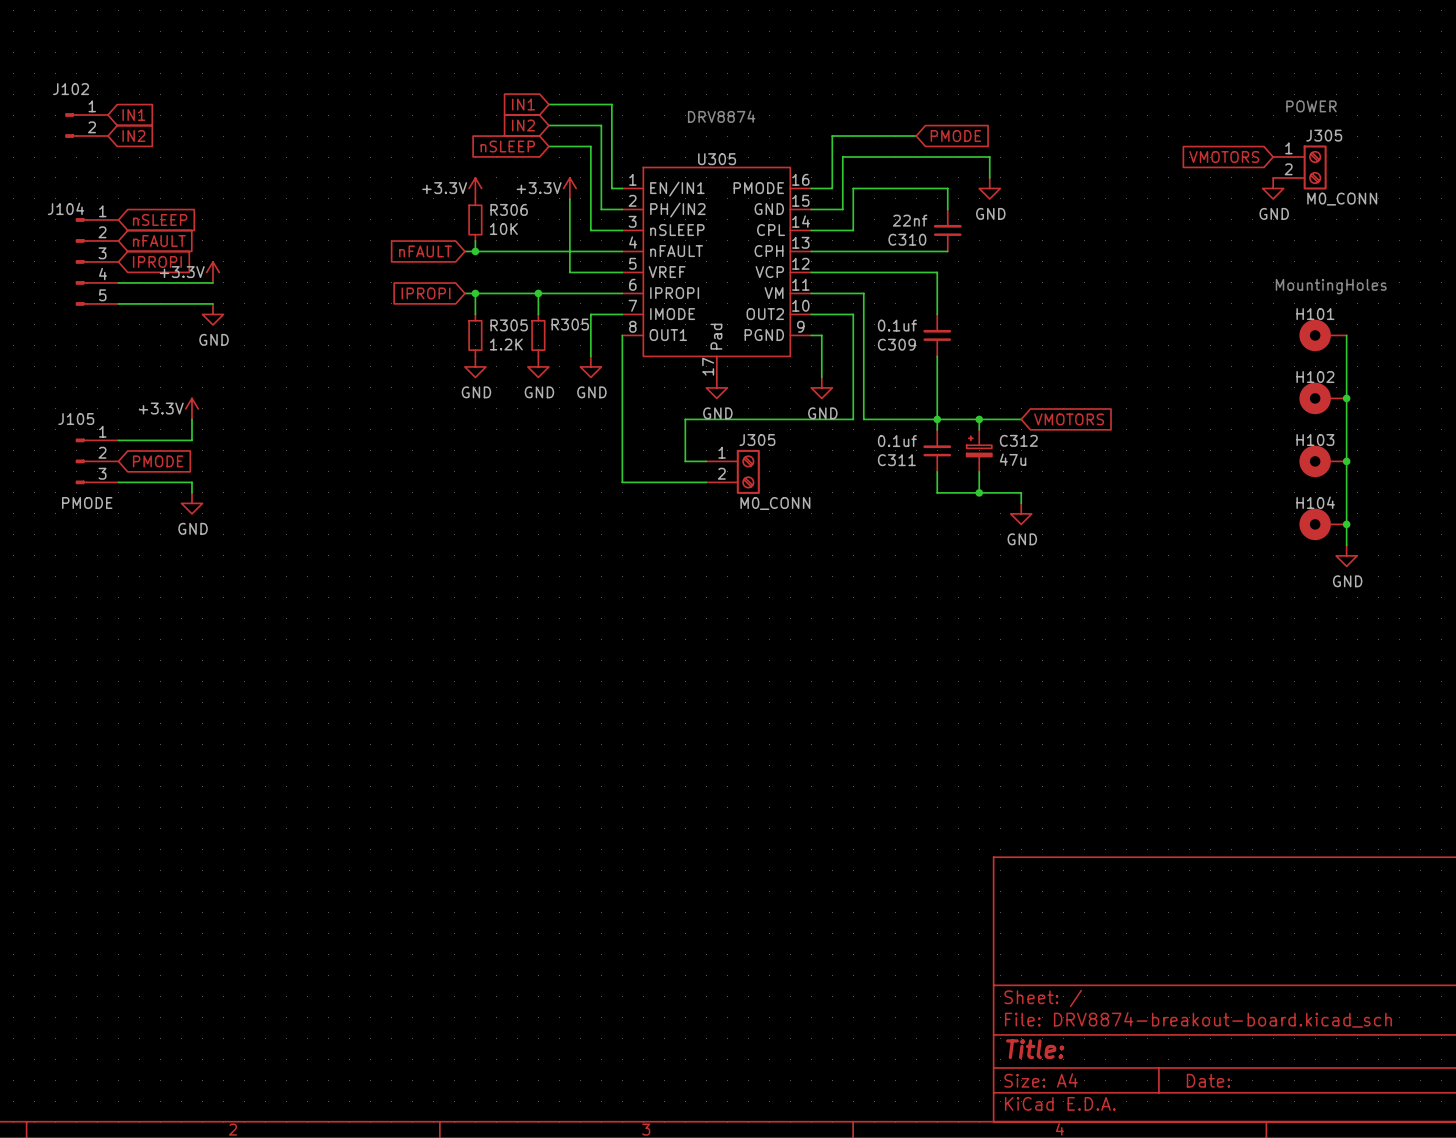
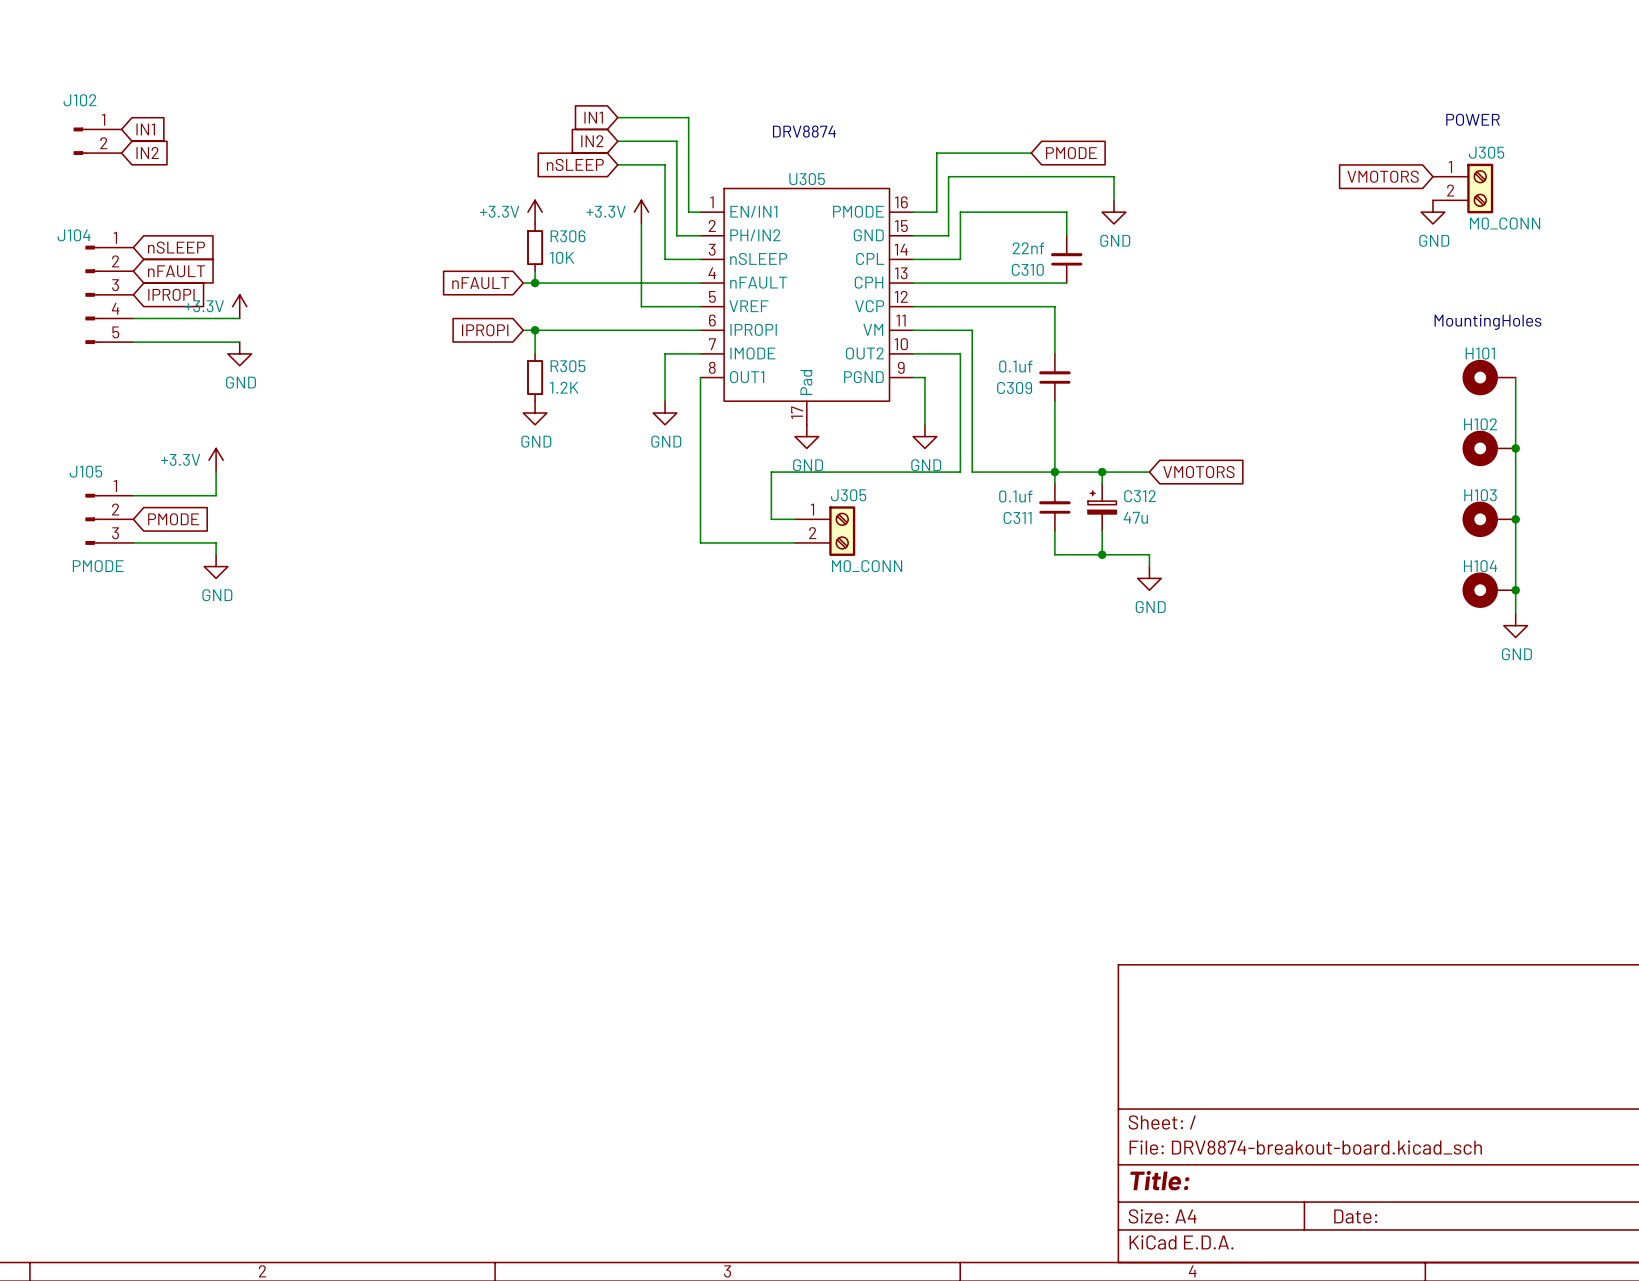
wire: (538, 293) (538, 314) -> none
junction: (538, 293) -> none
R305: (538, 335) -> none
power symbol: GND (538, 366) -> none

